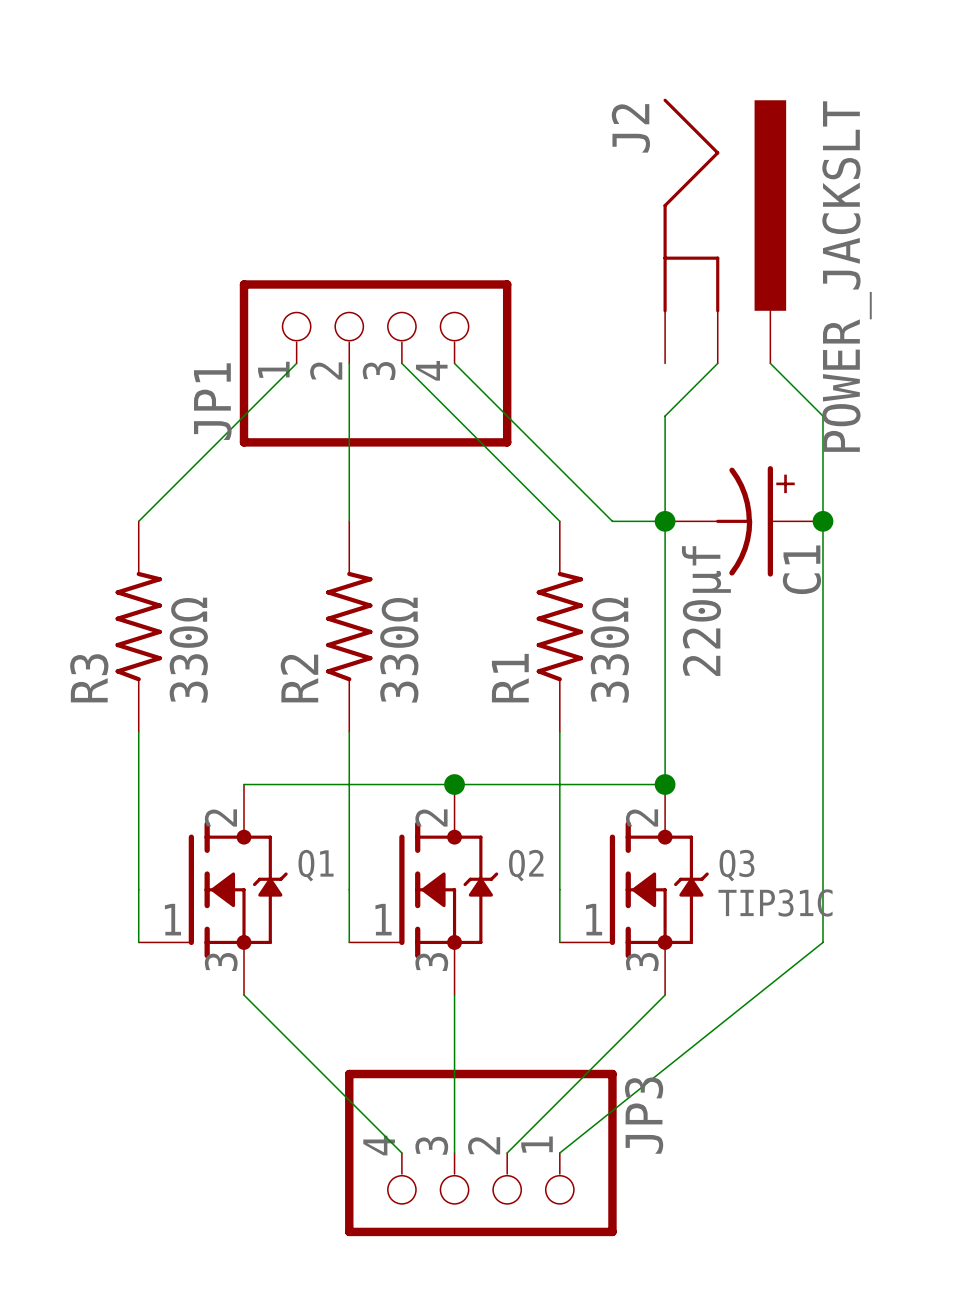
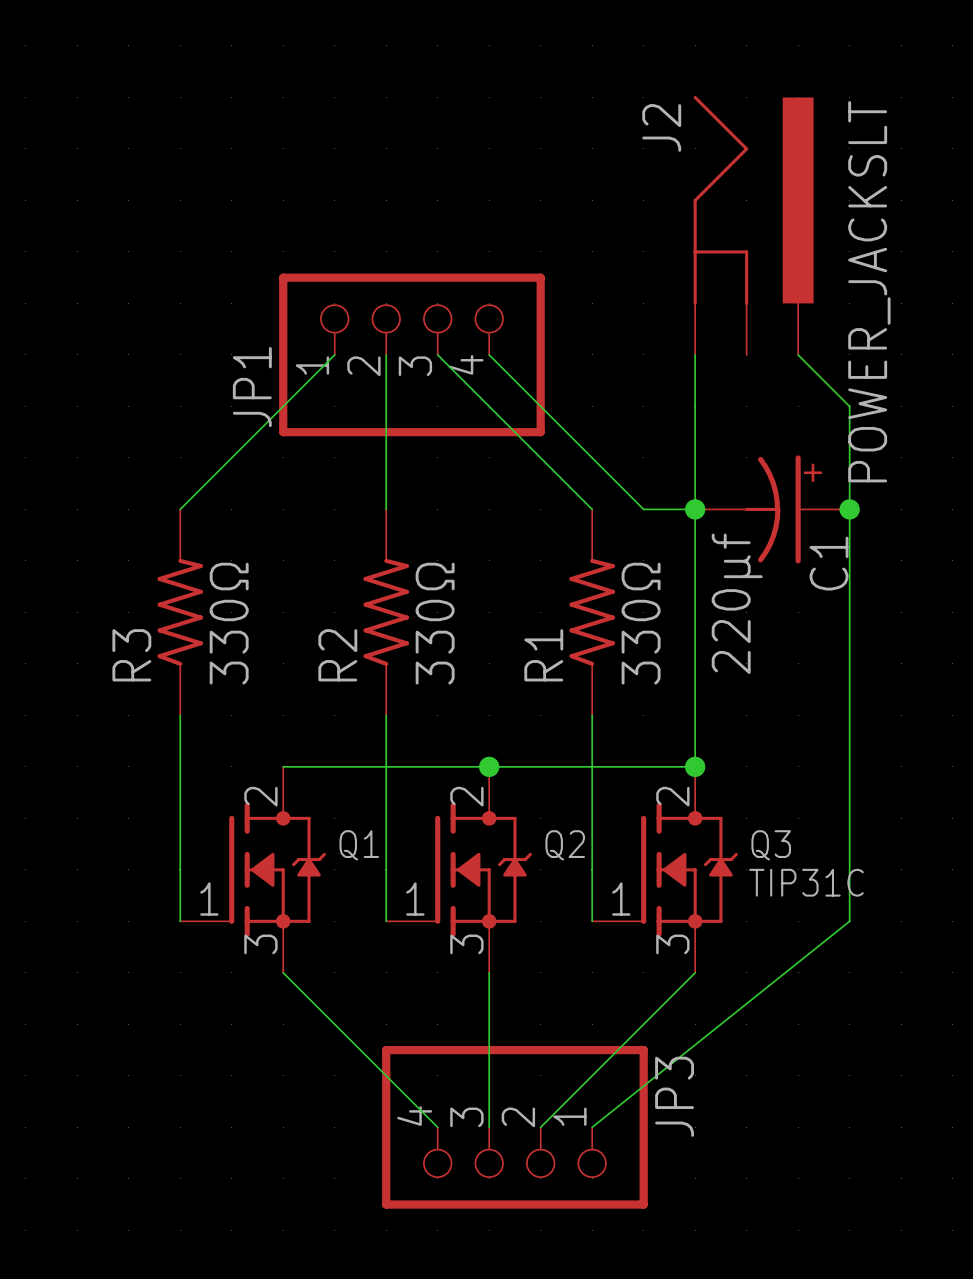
wire: (717, 363) (665, 416) -> (695, 354) (695, 406)

